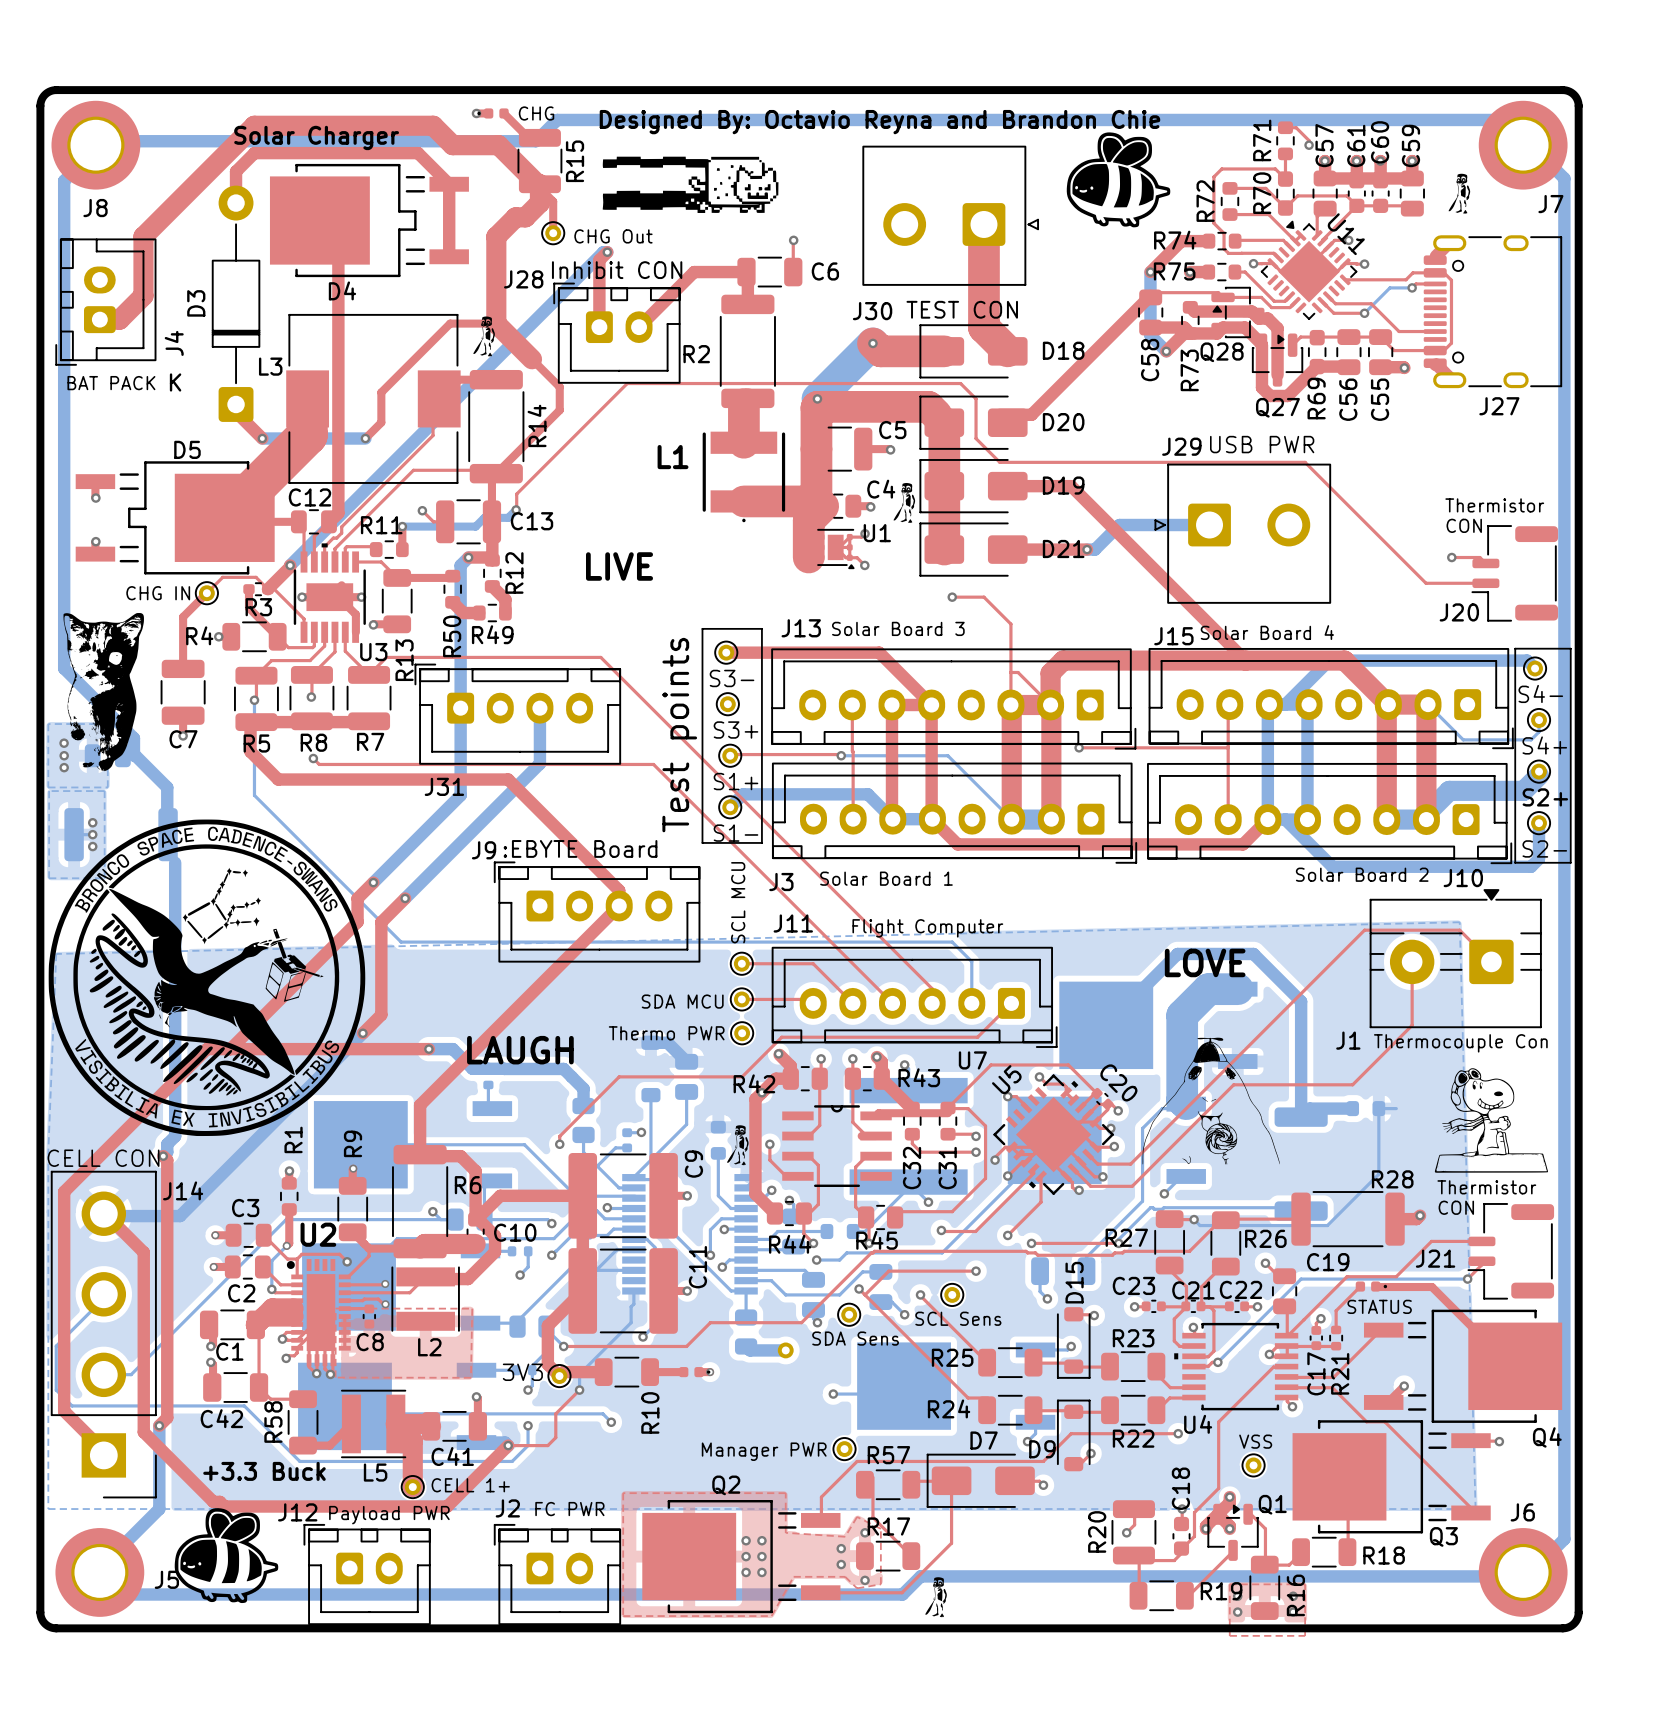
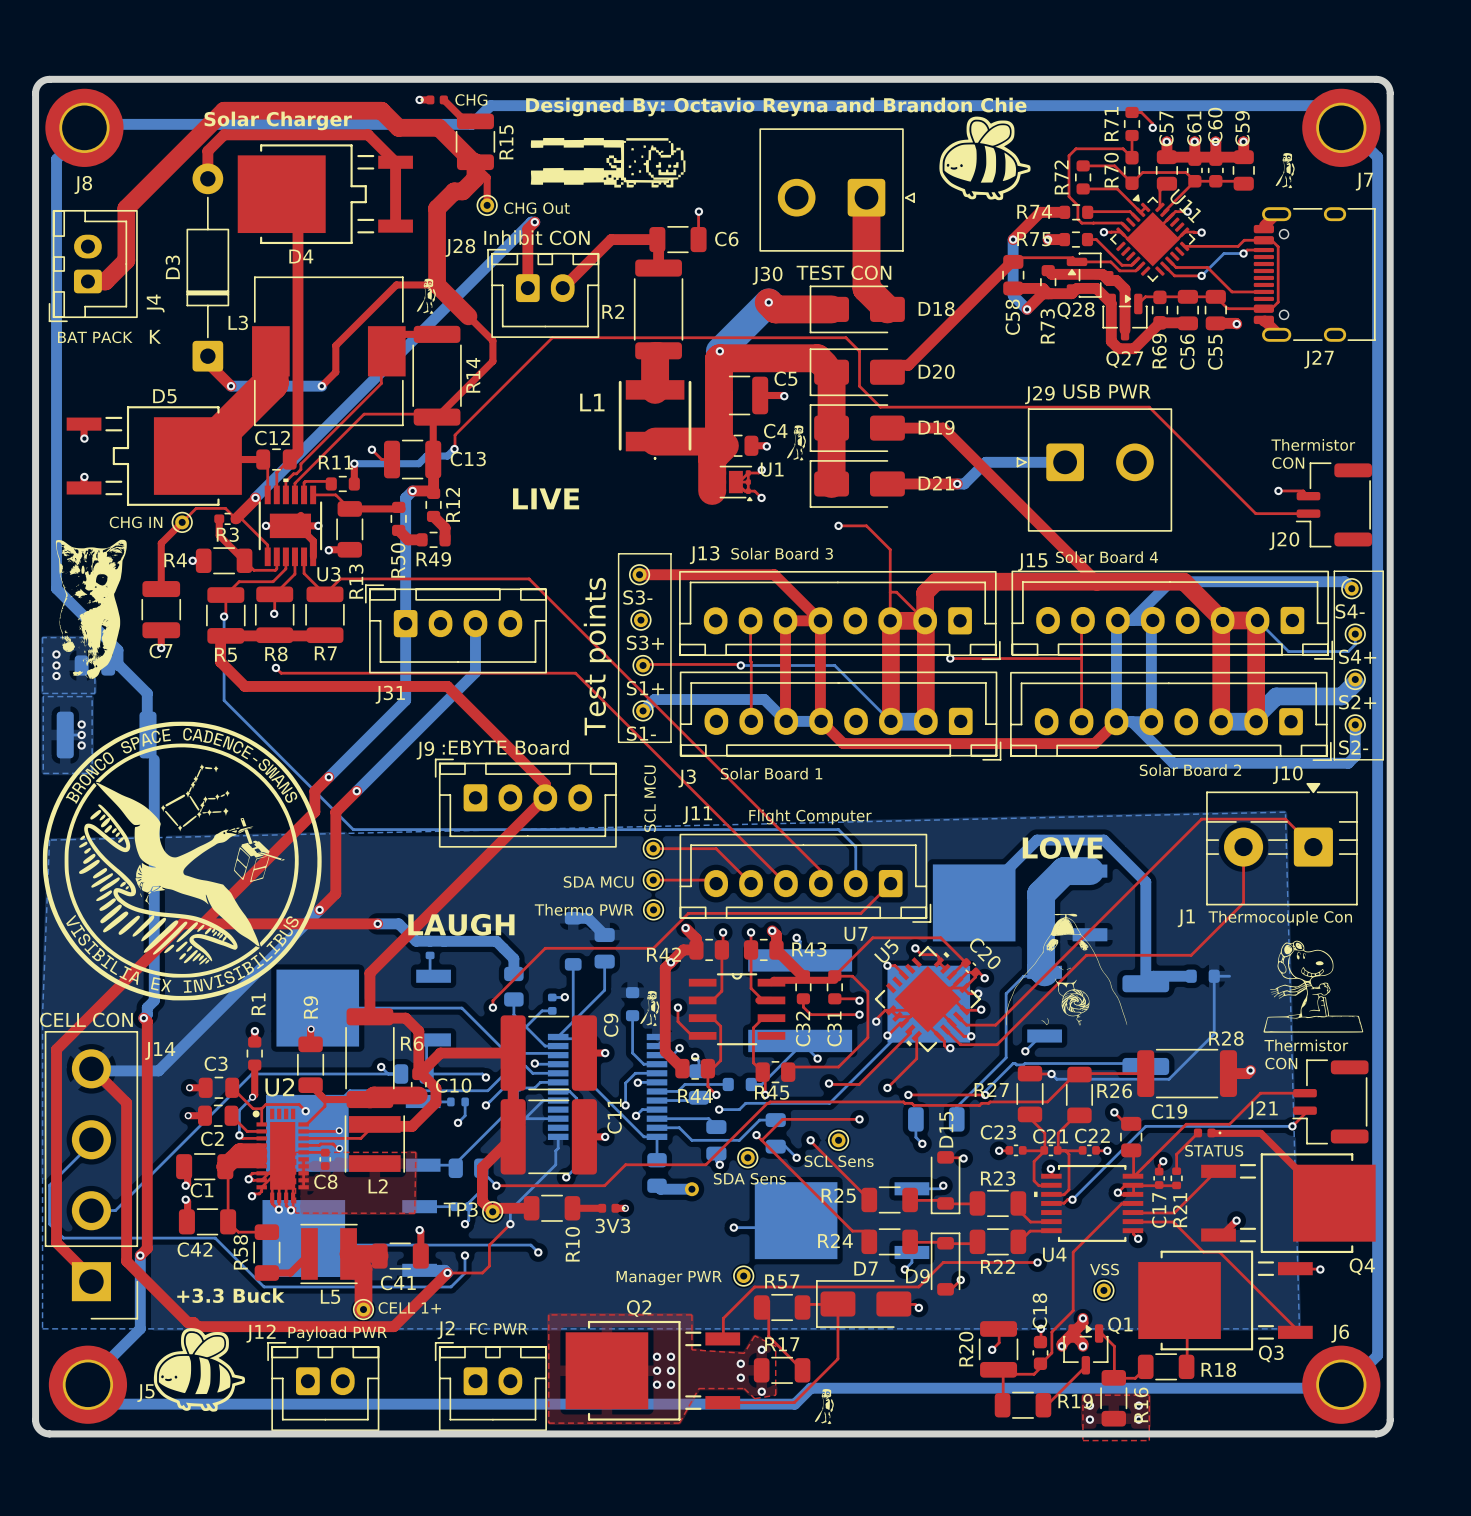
text position: 3V3 (522, 1372) -> 3V3 (612, 1225)
TP3 name: none -> TP3 (460, 1209)

